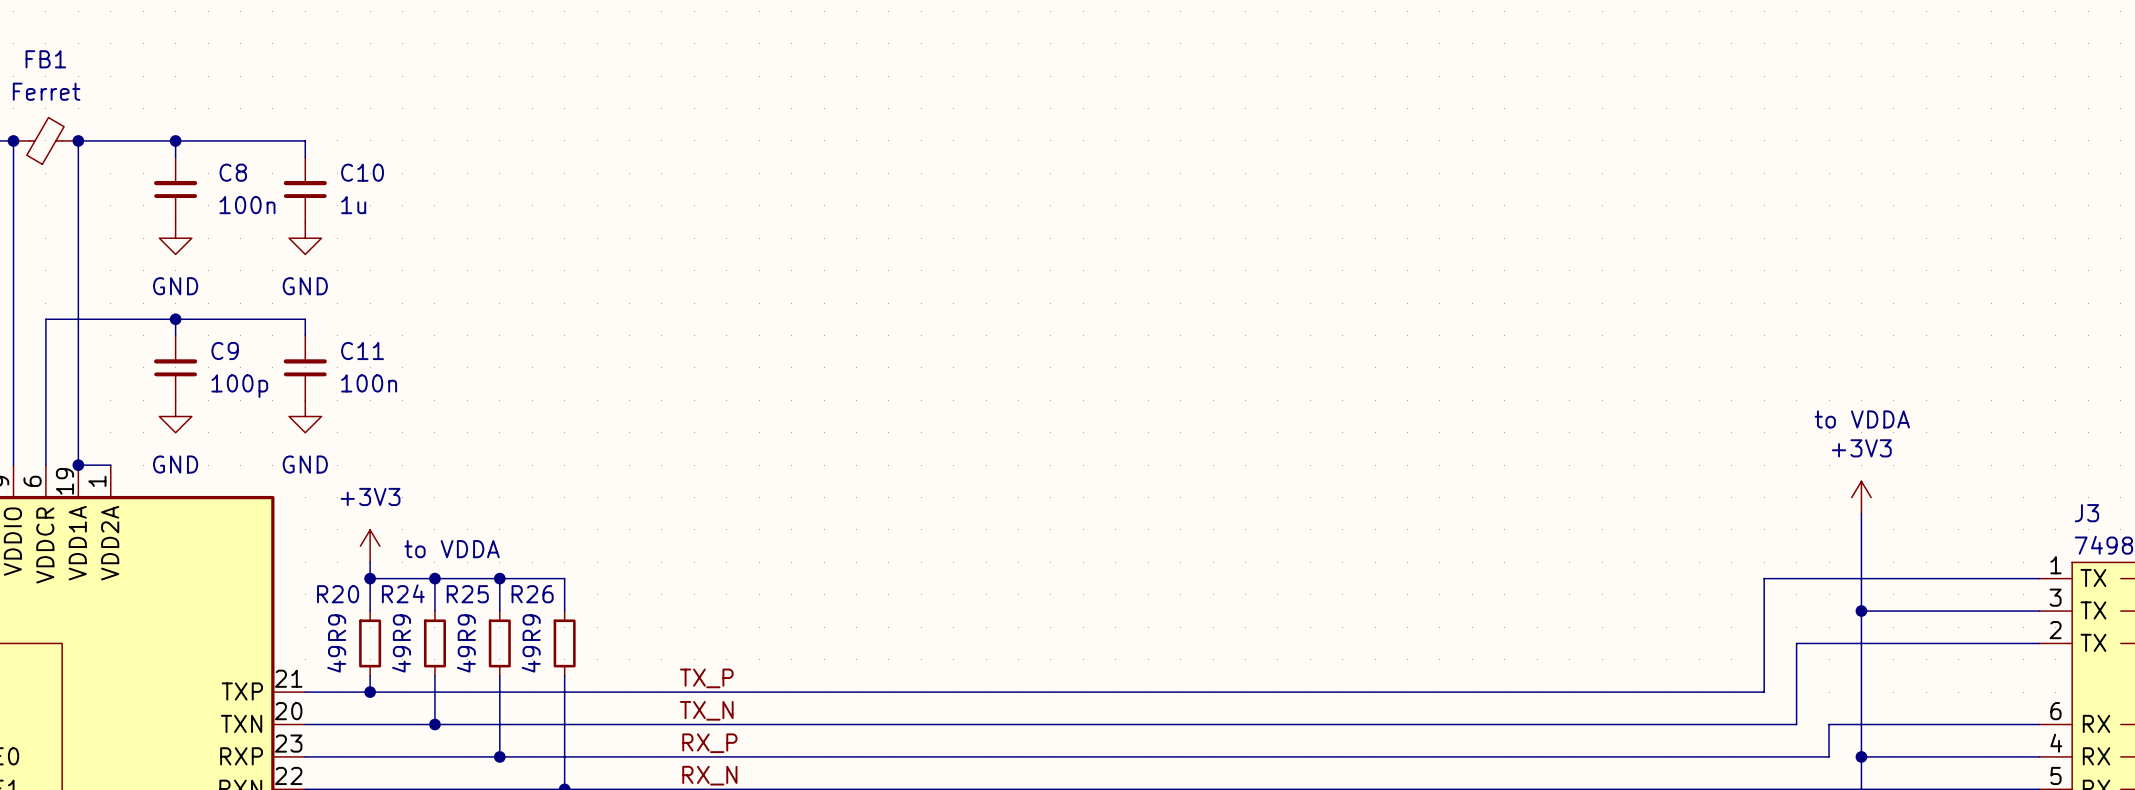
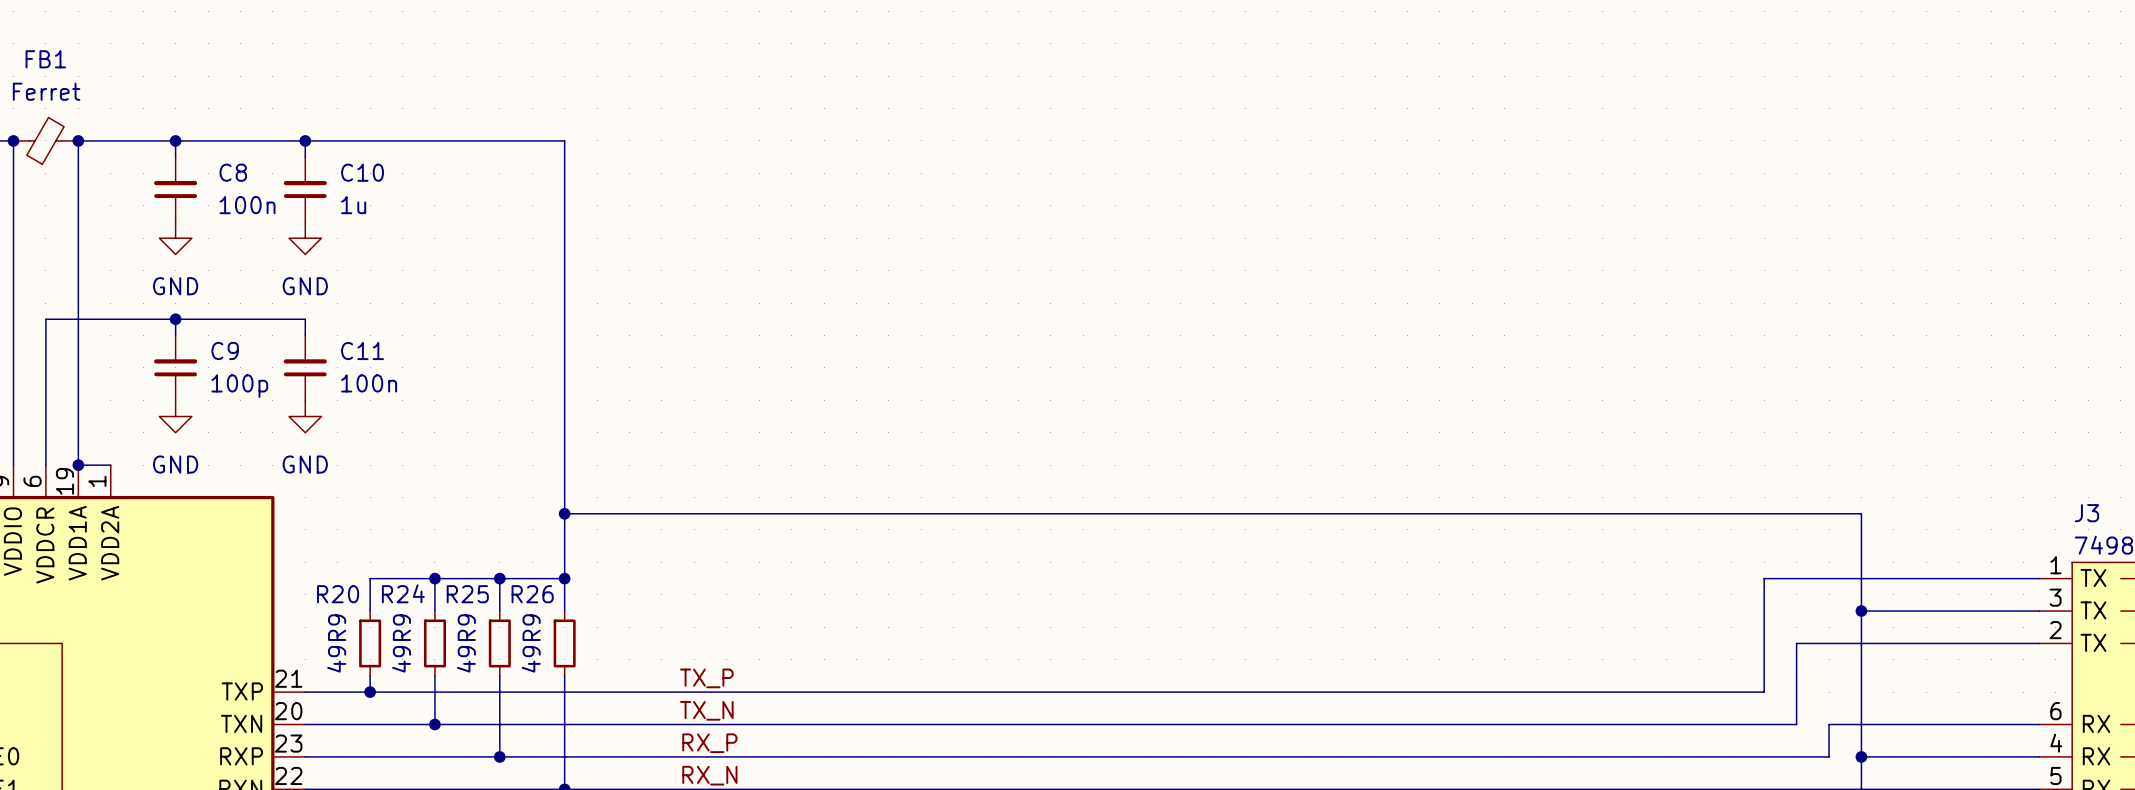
wire: none -> (305, 140) (564, 140) (564, 578)
junction: none -> (305, 140)
text: to VDDA (1862, 419) -> none
power symbol: +3V3 (1861, 497) -> none
wire: none -> (564, 513) (1861, 513)
junction: none -> (564, 513)
power symbol: +3V3 (370, 546) -> none
text: to VDDA (452, 549) -> none
wire: (370, 562) (370, 578) -> none
junction: (370, 578) -> none
junction: none -> (564, 578)

